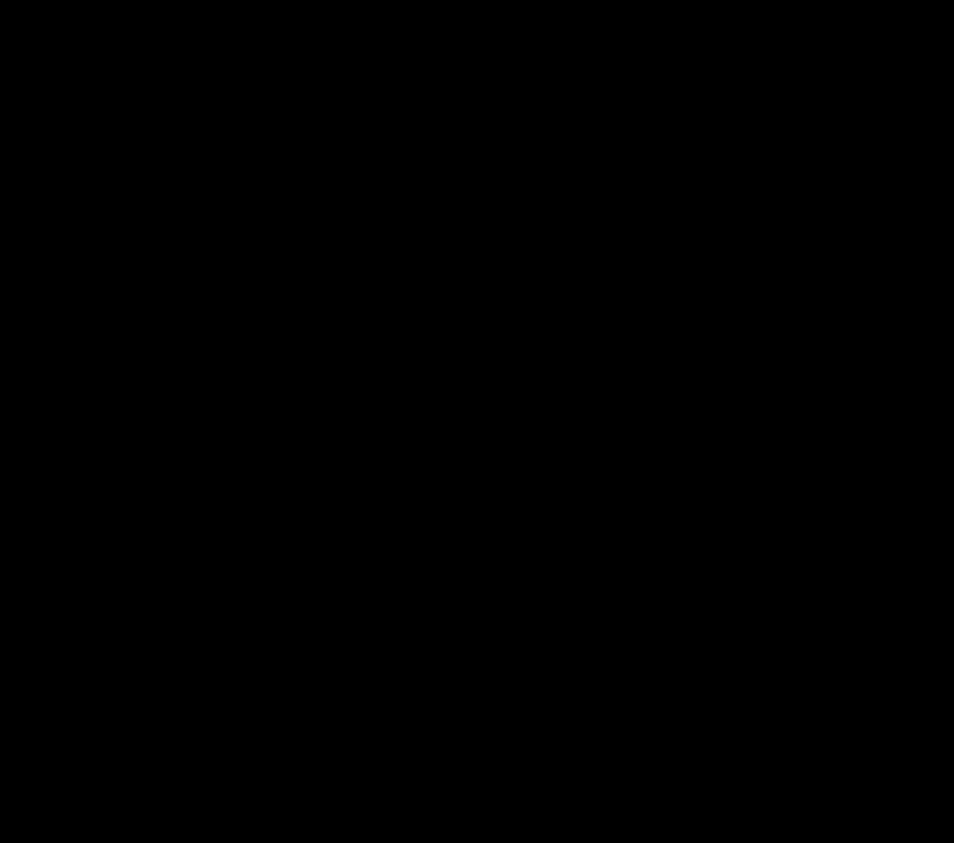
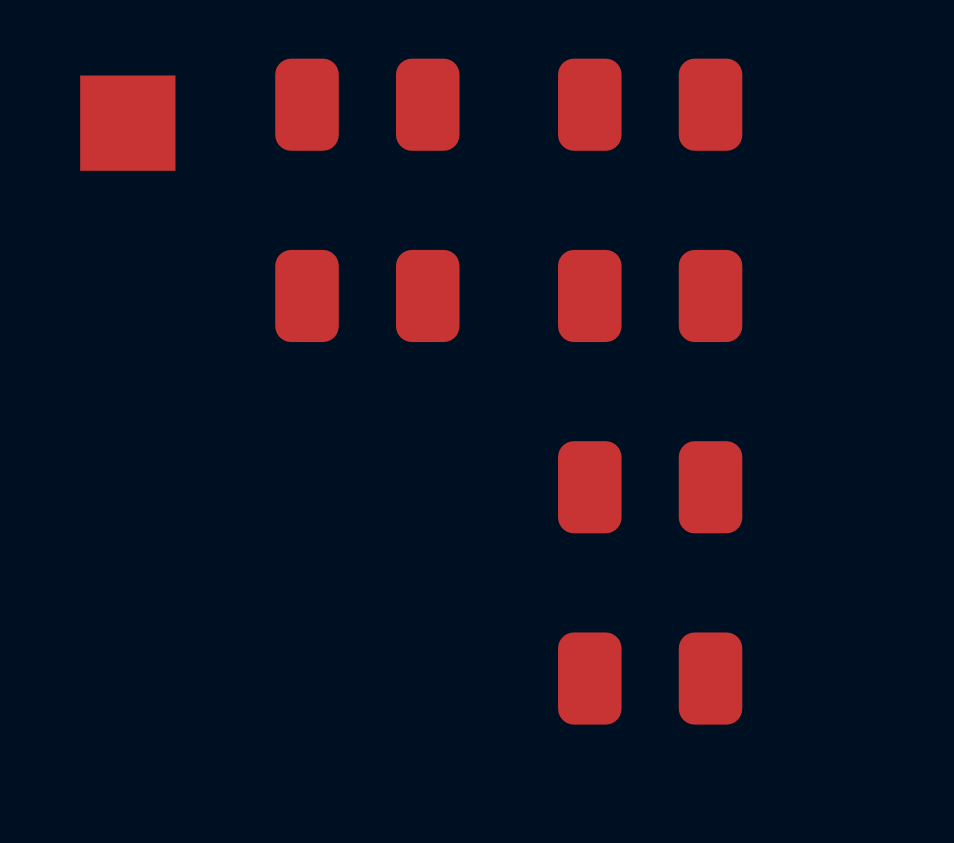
part: none -> (367, 104)
part: none -> (650, 104)
part: none -> (127, 123)
part: none -> (367, 295)
part: none -> (650, 295)
part: none -> (650, 487)
part: none -> (650, 678)

